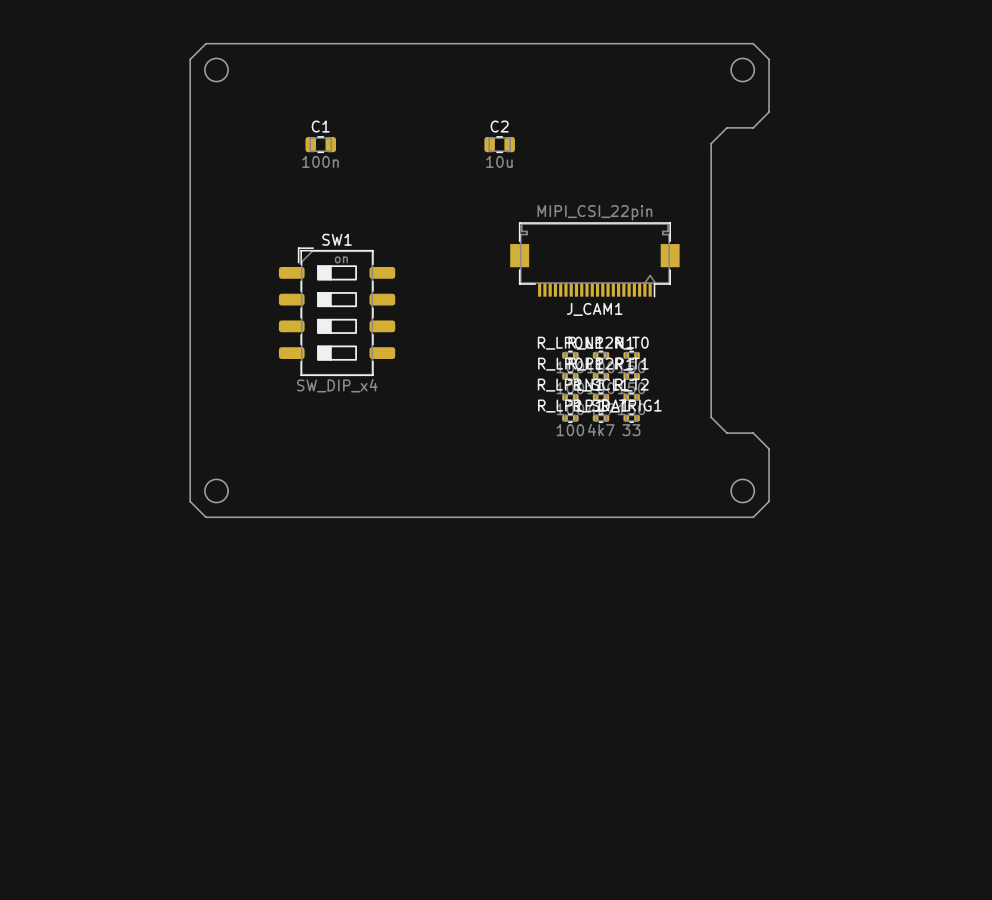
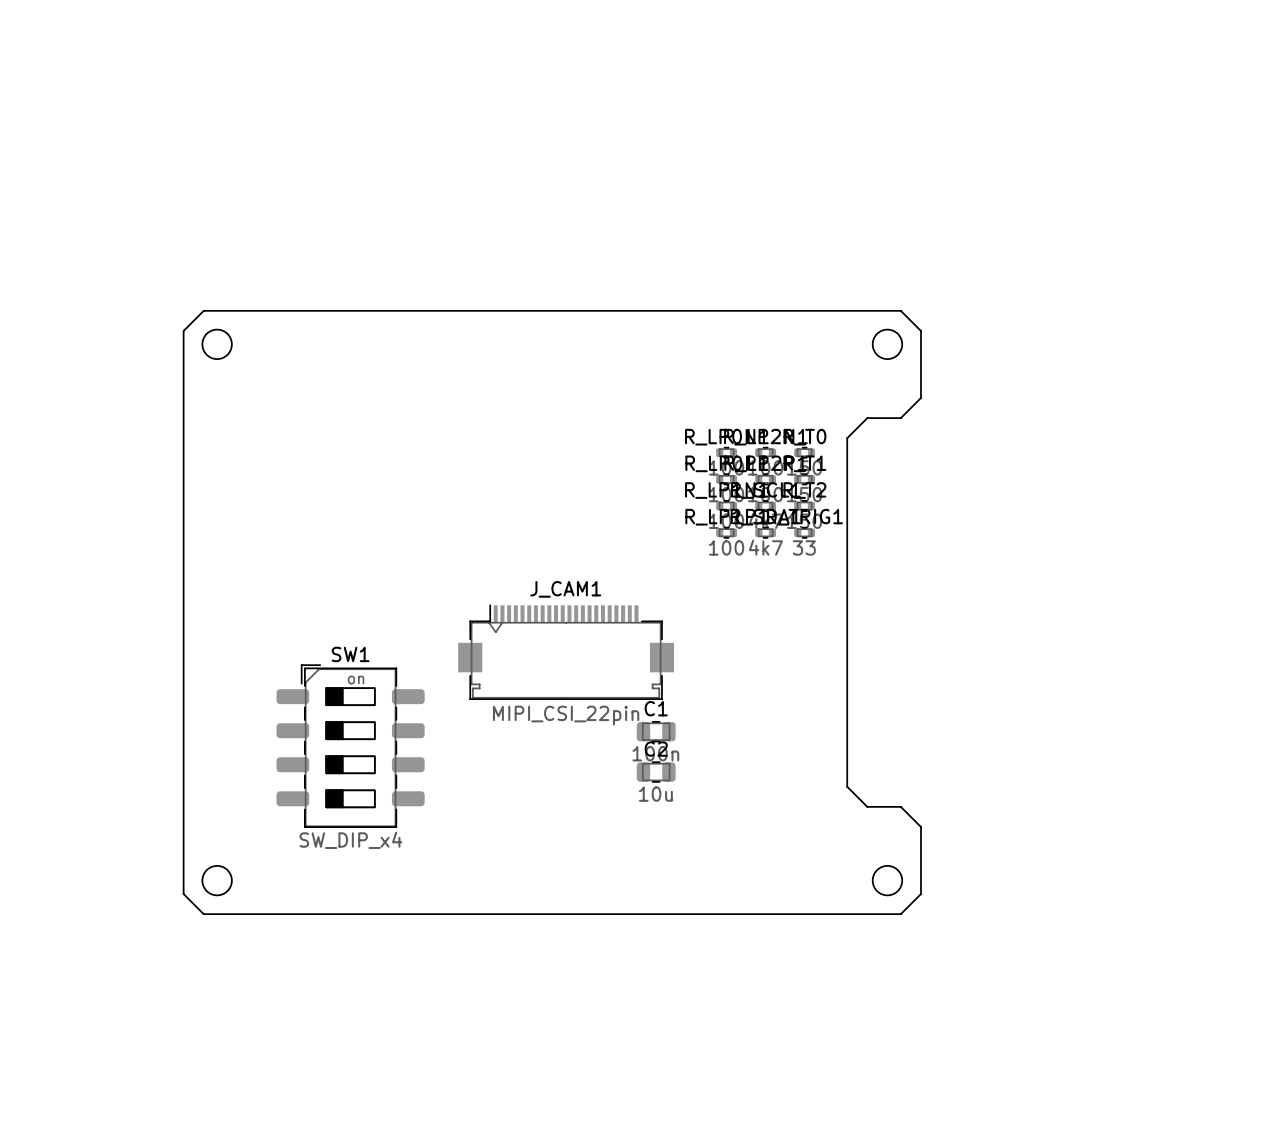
board edge: (205, 43) (190, 59) (190, 501) (205, 517) (753, 517) (769, 501) (769, 448) (753, 433) (726, 433) (711, 417) (711, 143) (726, 127) (753, 127) (769, 112) (769, 59) (753, 43) (205, 43) -> (203, 310) (183, 330) (183, 894) (203, 914) (900, 914) (920, 894) (920, 826) (900, 806) (867, 806) (847, 786) (847, 438) (867, 418) (900, 418) (920, 397) (920, 330) (900, 310) (203, 310)
round board edge: [204, 57, 229, 83] -> none
round board edge: [730, 57, 755, 83] -> none
C1 position: (320, 144) -> (656, 731)
C2 position: (499, 144) -> (656, 772)
round board edge: none -> [201, 328, 233, 360]
round board edge: none -> [872, 328, 903, 360]
J_CAM1 rotation: 0° (594, 259) -> 180° (566, 652)
J_CAM1 position: (594, 259) -> (566, 652)
SW1 position: (337, 311) -> (350, 746)
round board edge: [204, 478, 229, 504] -> none
round board edge: [730, 478, 755, 504] -> none
round board edge: none -> [201, 865, 233, 897]
round board edge: none -> [872, 865, 903, 897]

